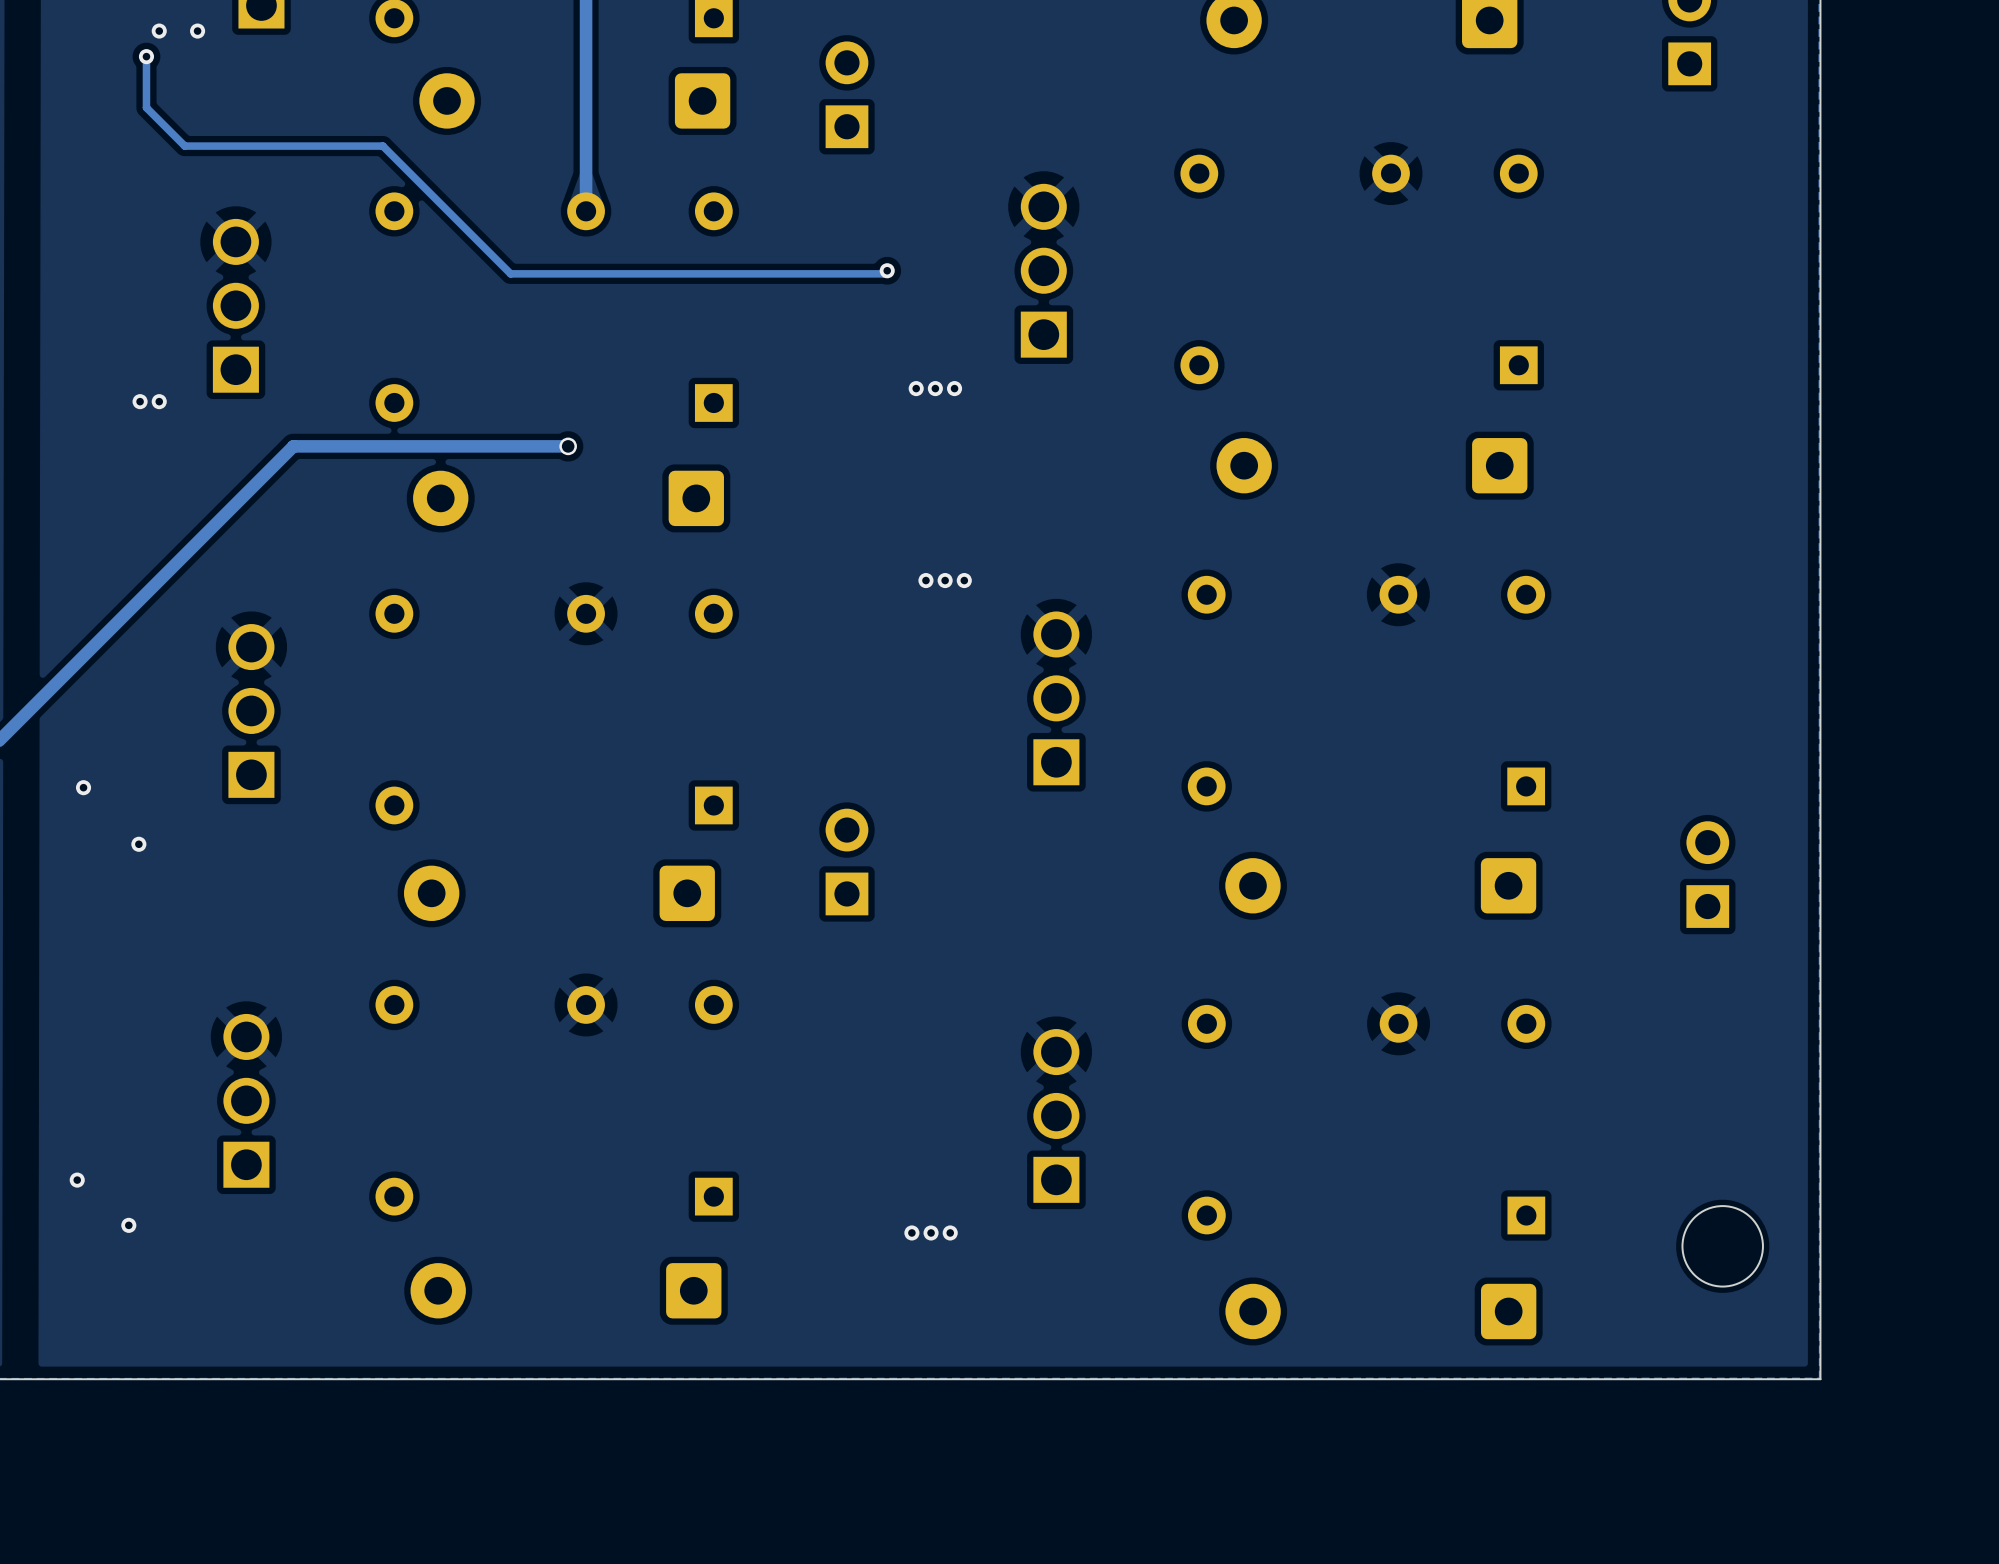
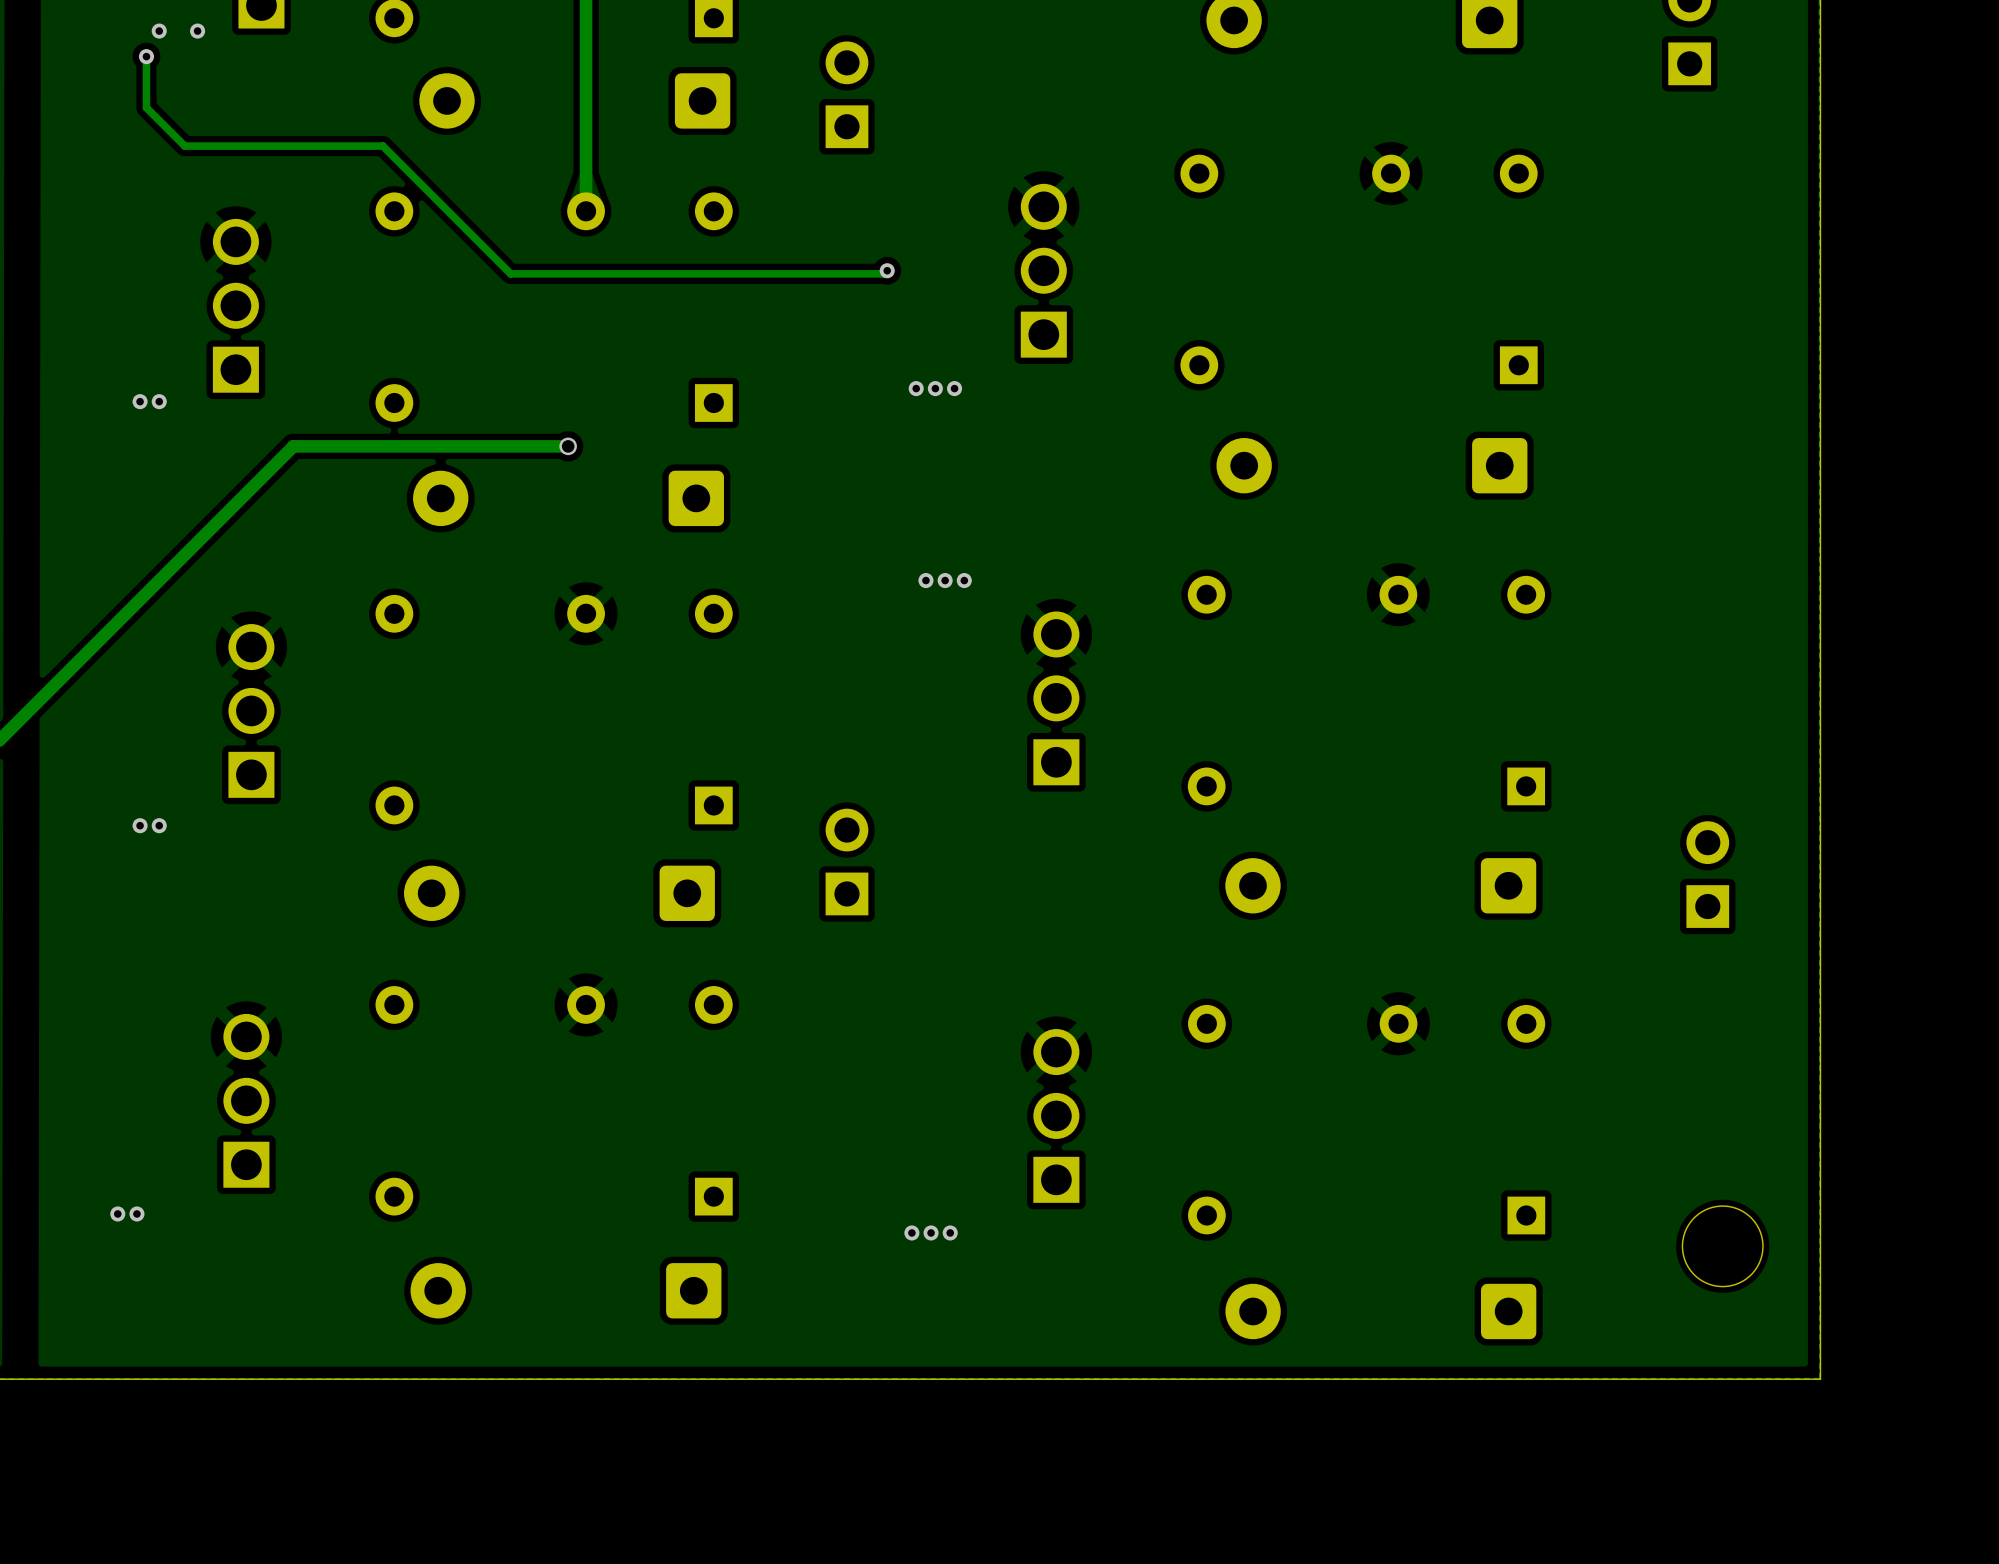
via: (83, 787) -> none
via: none -> (140, 825)
via: none -> (159, 825)
via: (138, 844) -> none
via: (77, 1180) -> none
via: none -> (117, 1213)
via: none -> (136, 1213)
via: (128, 1225) -> none

